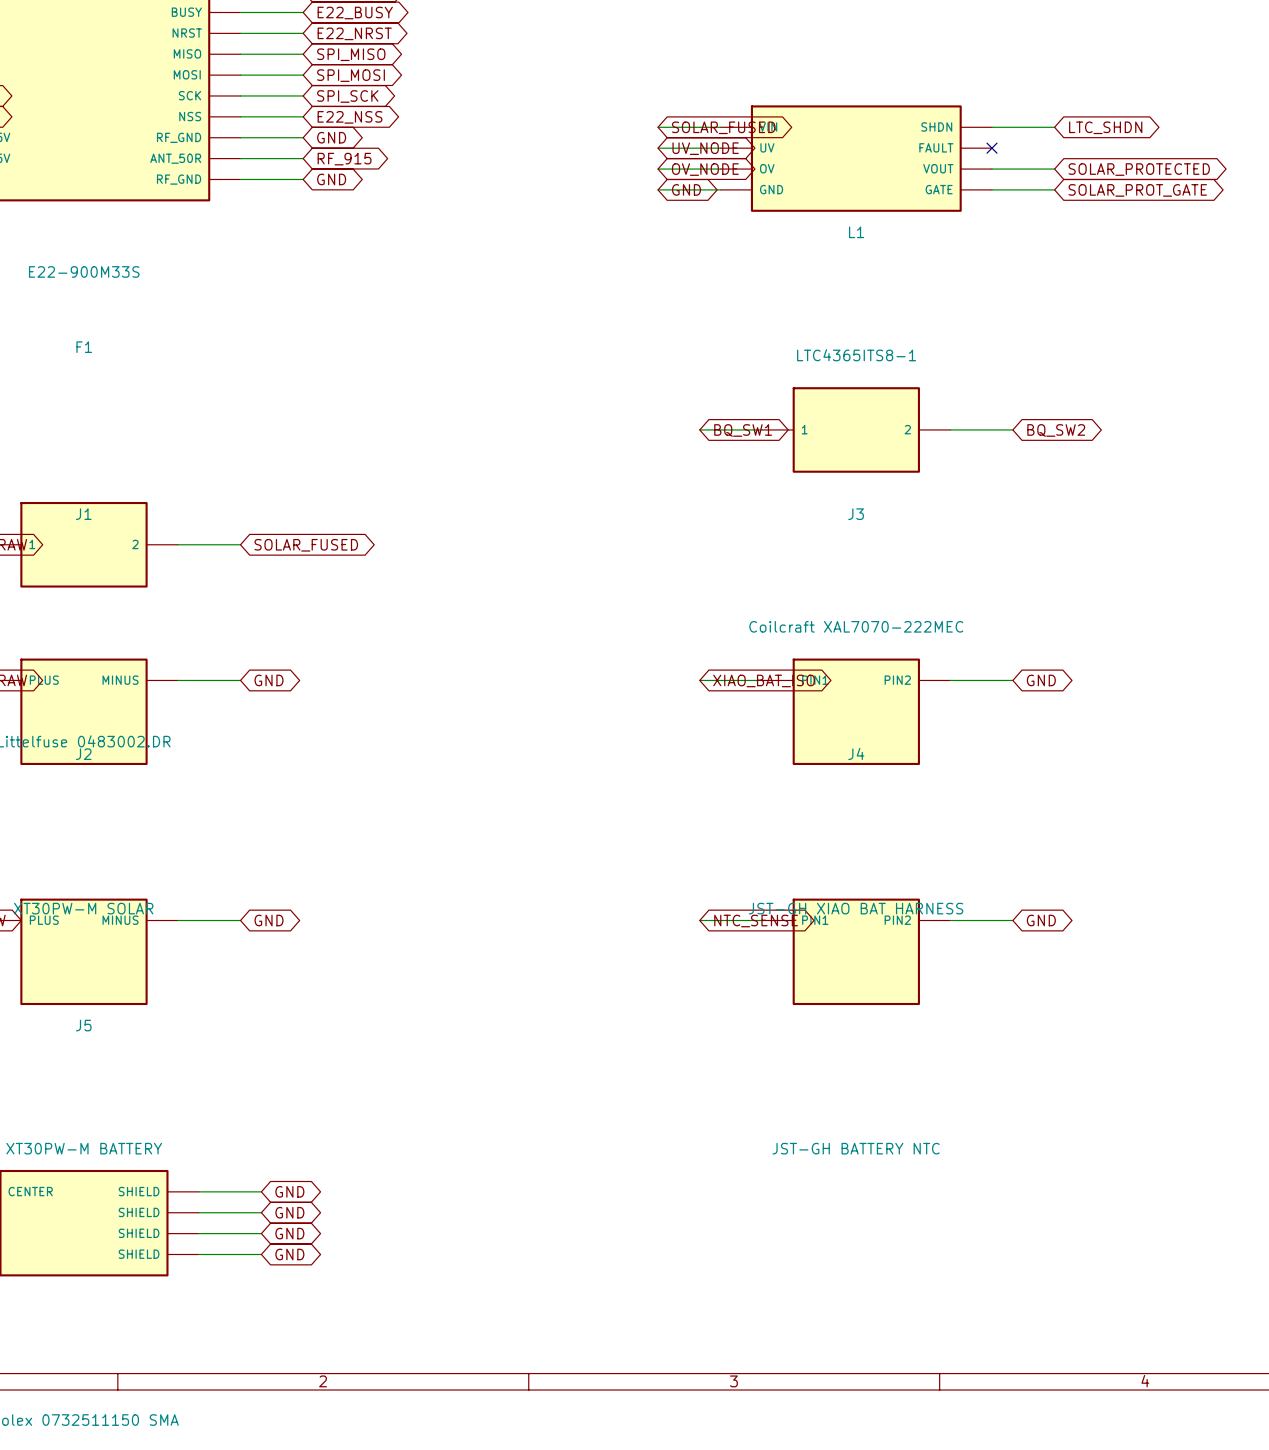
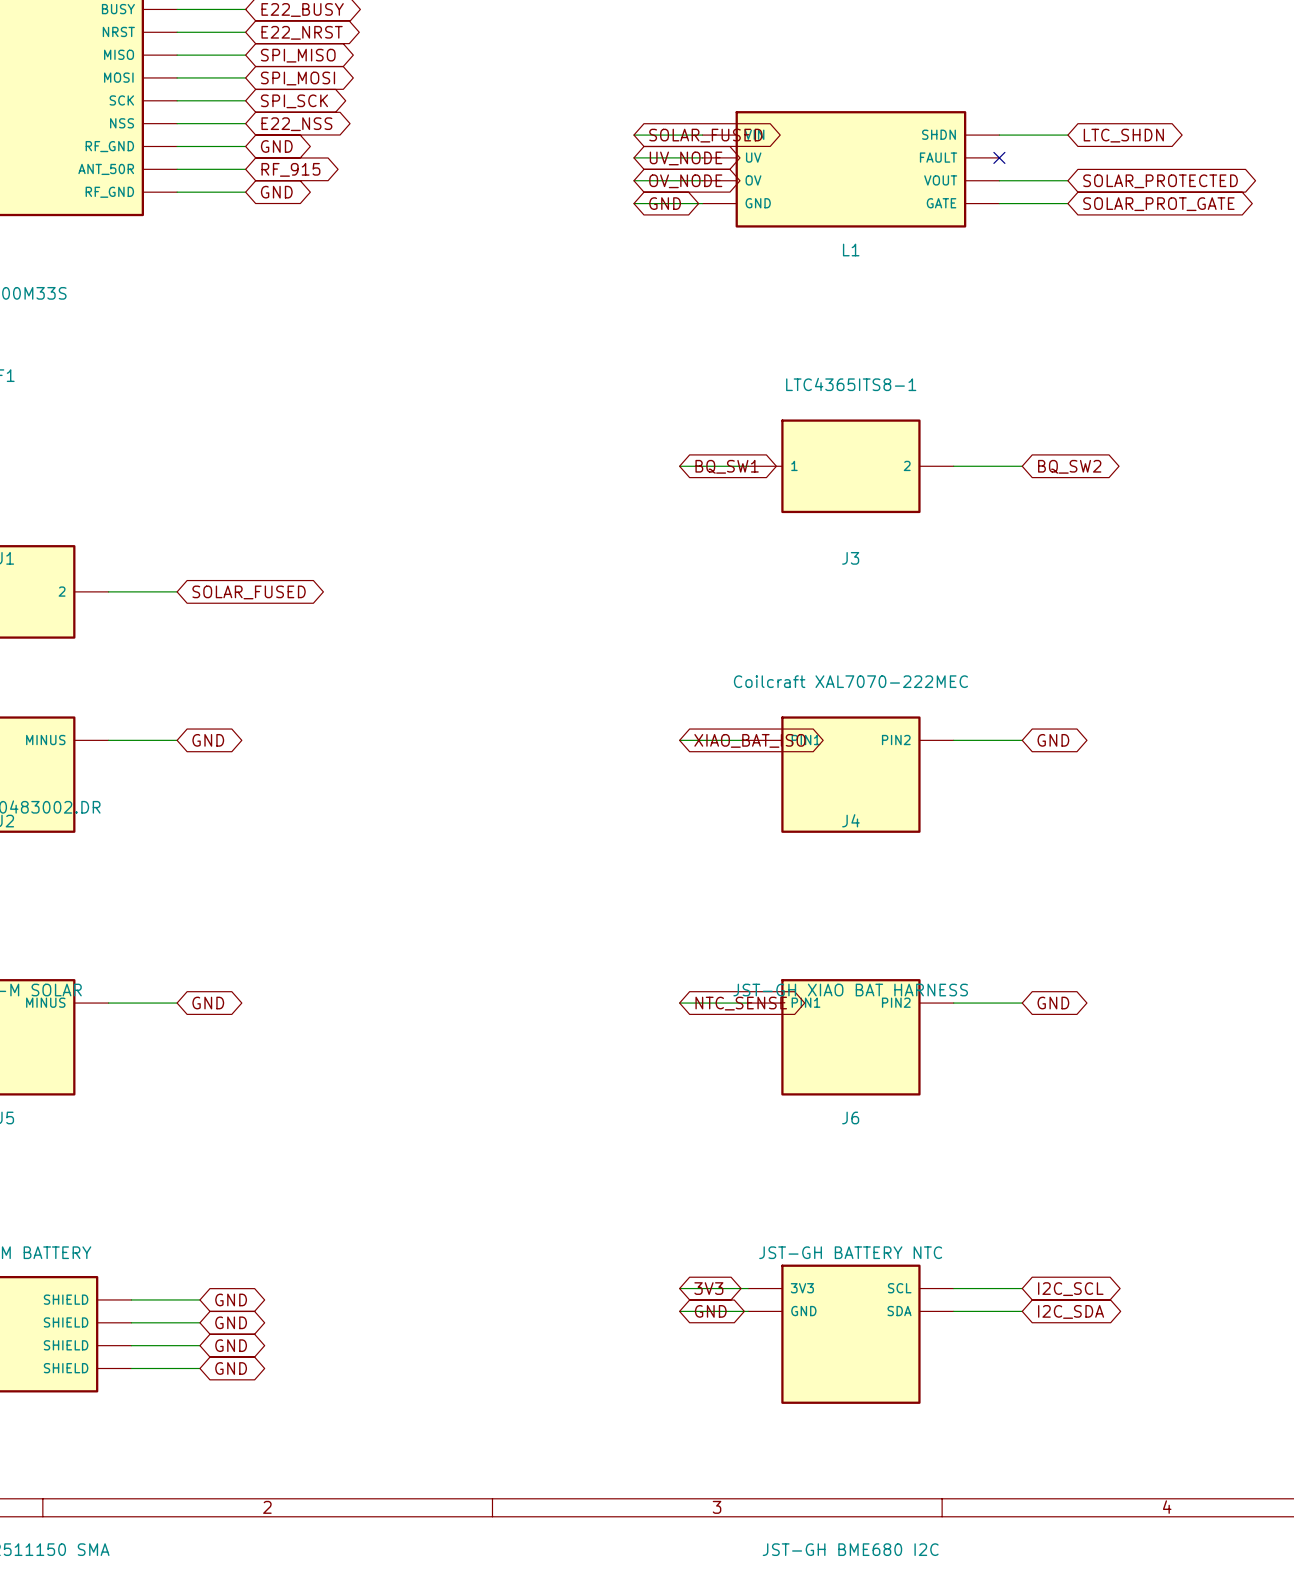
wire: none -> (679, 1288) (748, 1288)
global label: none -> 3V3 (708, 1288)
wire: none -> (953, 1288) (1022, 1288)
global label: none -> I2C_SCL (1070, 1289)
wire: none -> (679, 1311) (748, 1311)
global label: none -> GND (710, 1311)
wire: none -> (953, 1311) (1022, 1311)
global label: none -> I2C_SDA (1071, 1311)
J6: none -> JST-GH BME680 I2C (850, 1334)

